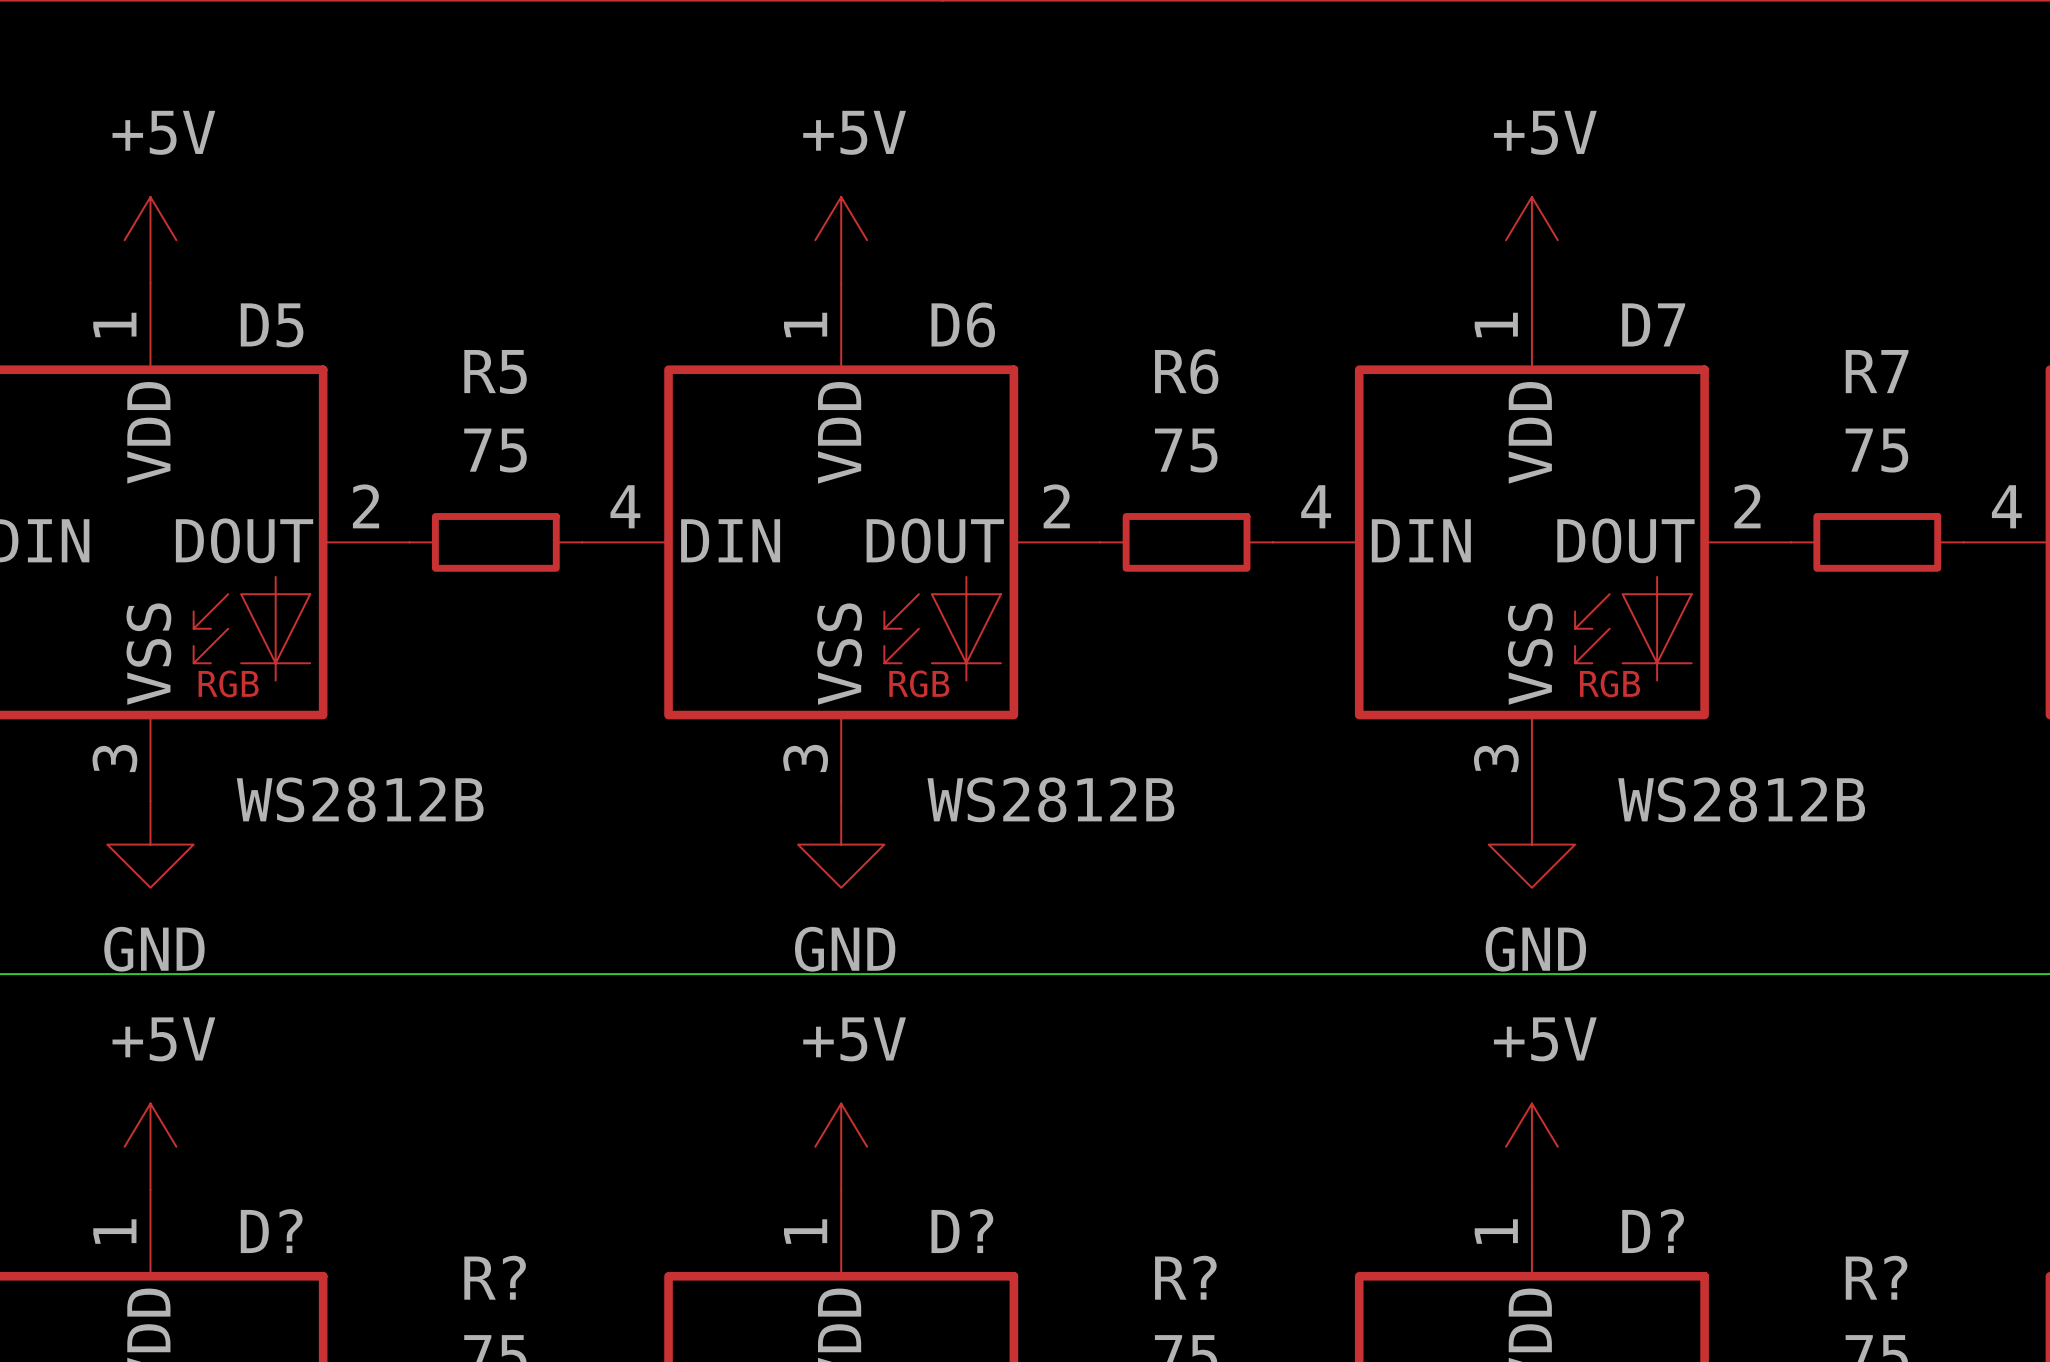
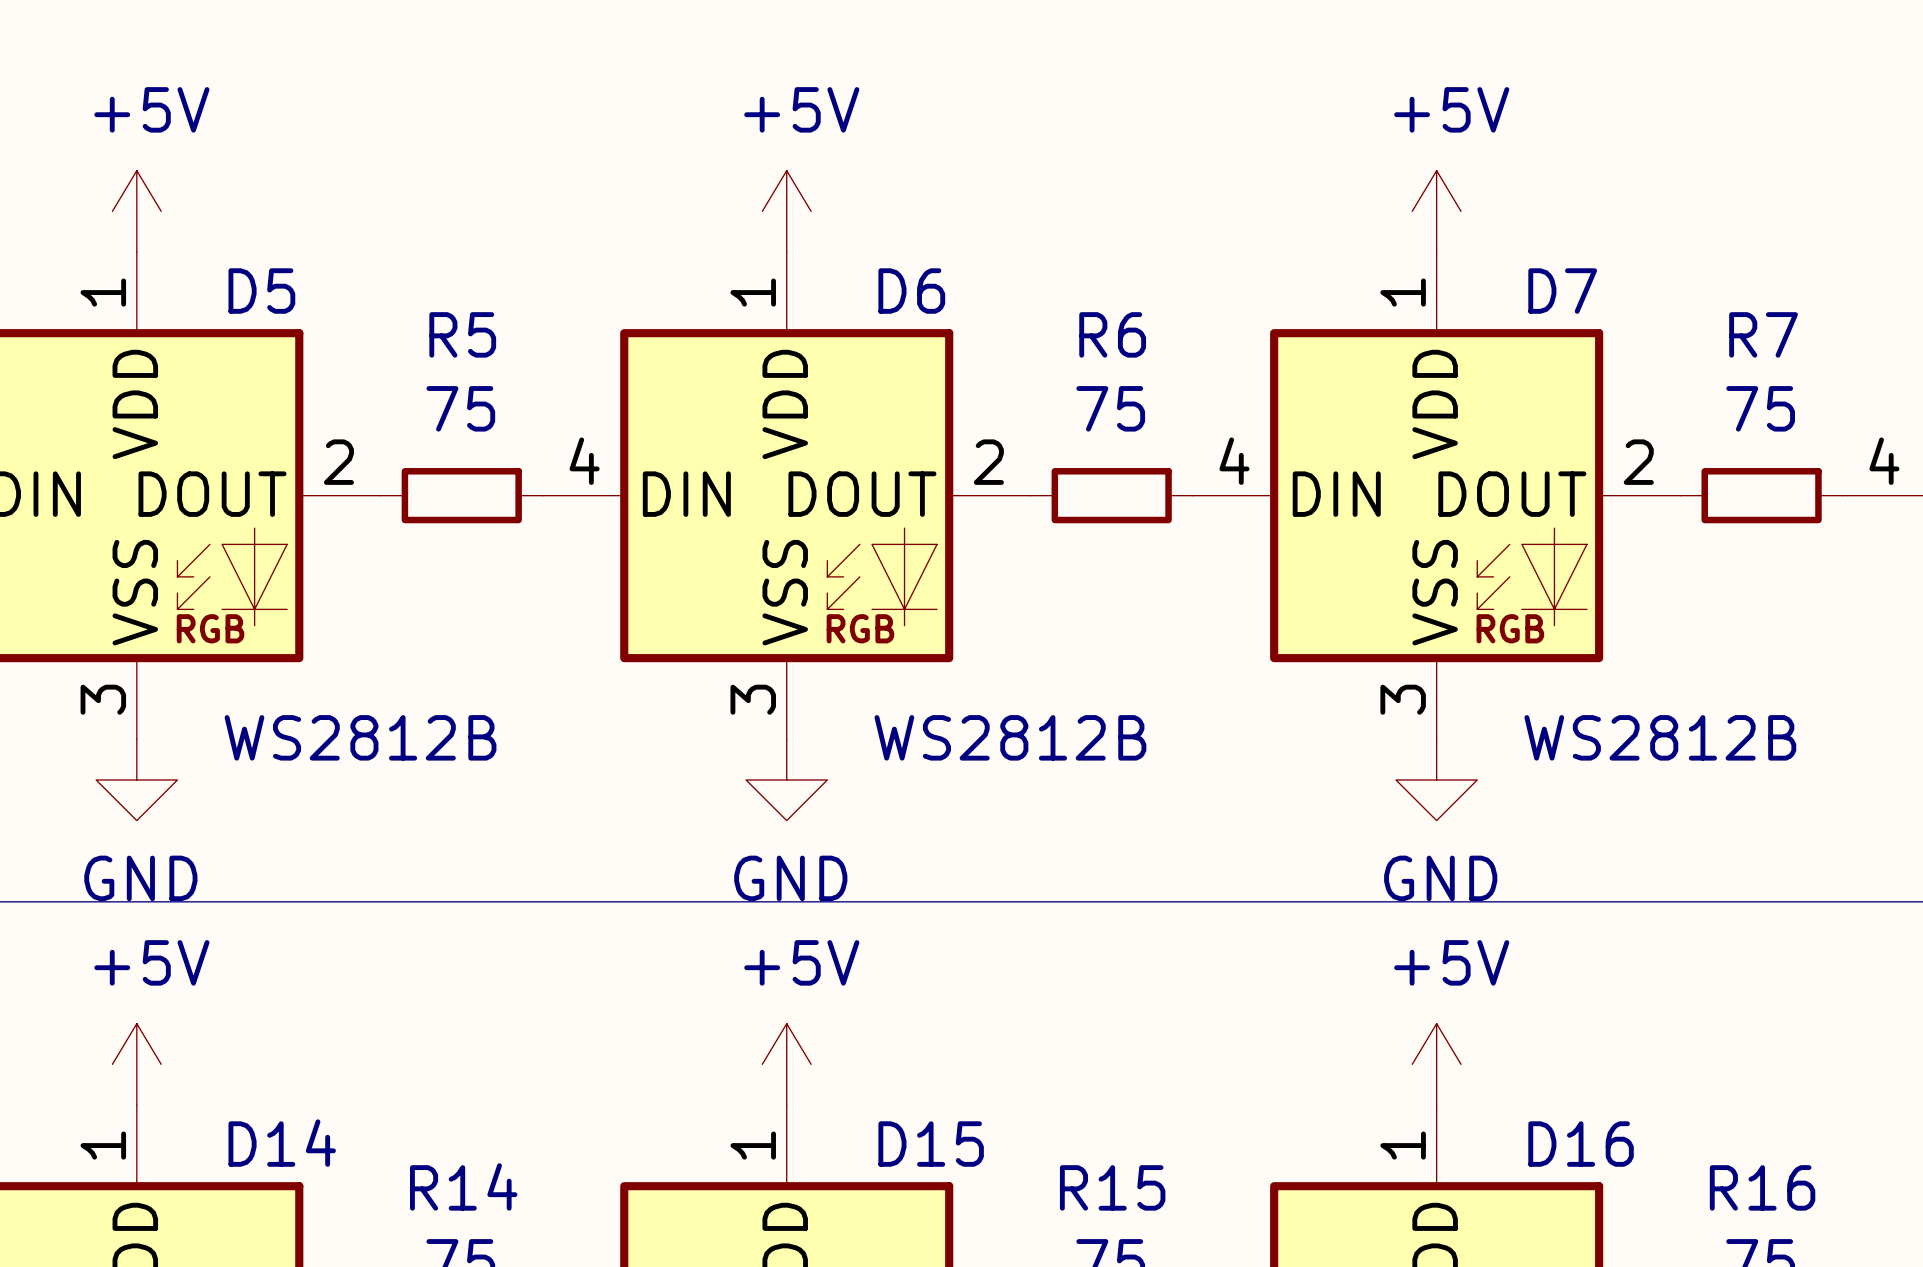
D? name: D? (271, 1231) -> D14 (282, 1143)
D? name: D? (962, 1231) -> D15 (931, 1144)
D? name: D? (1653, 1231) -> D16 (1581, 1144)
R? name: R? (495, 1277) -> R14 (463, 1186)
R? name: R? (1185, 1277) -> R15 (1112, 1187)
R? name: R? (1876, 1277) -> R16 (1762, 1187)

